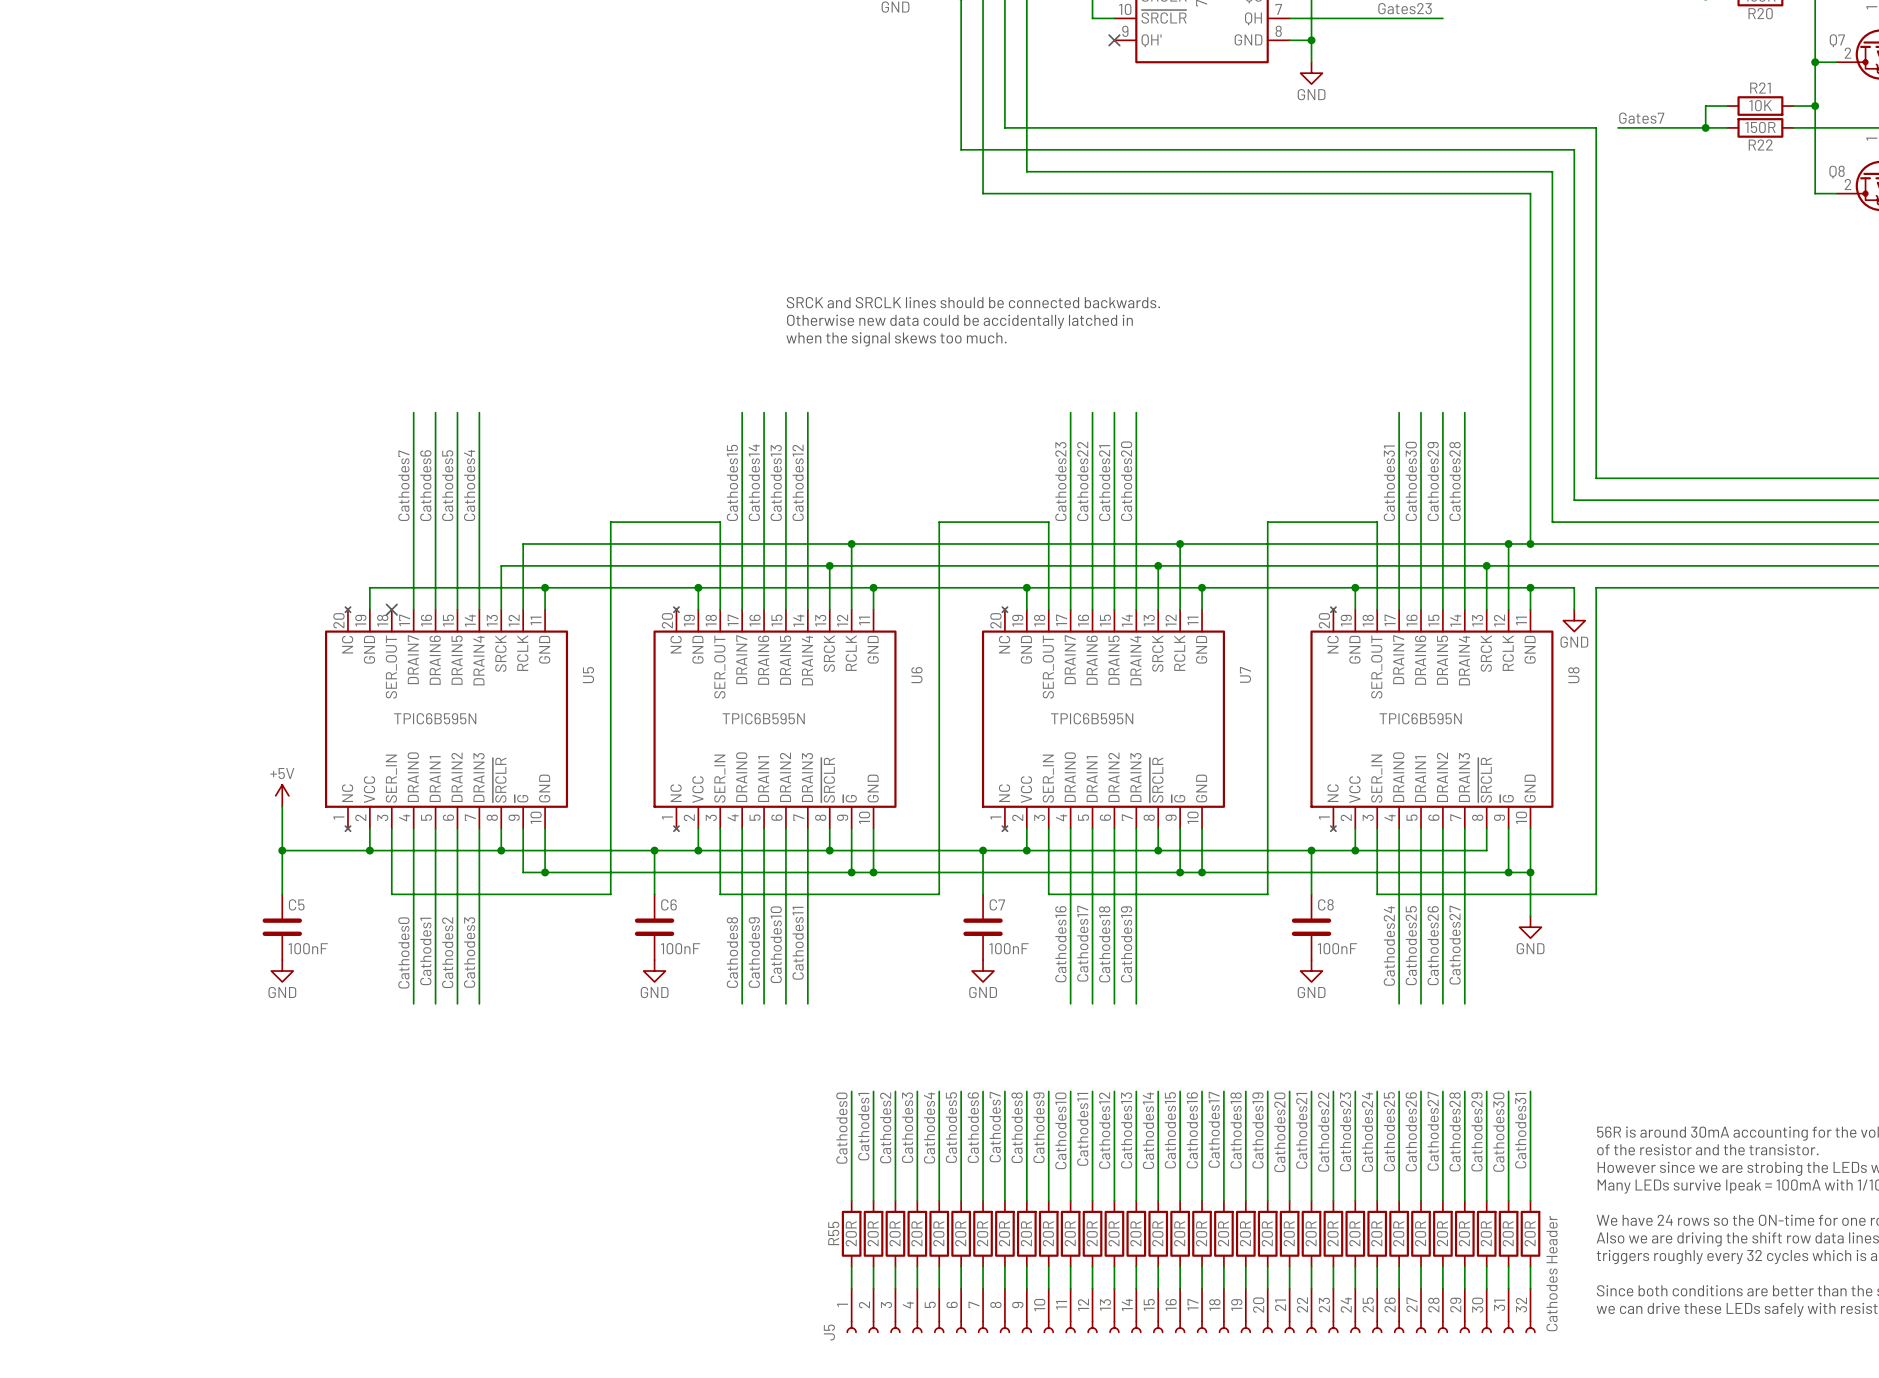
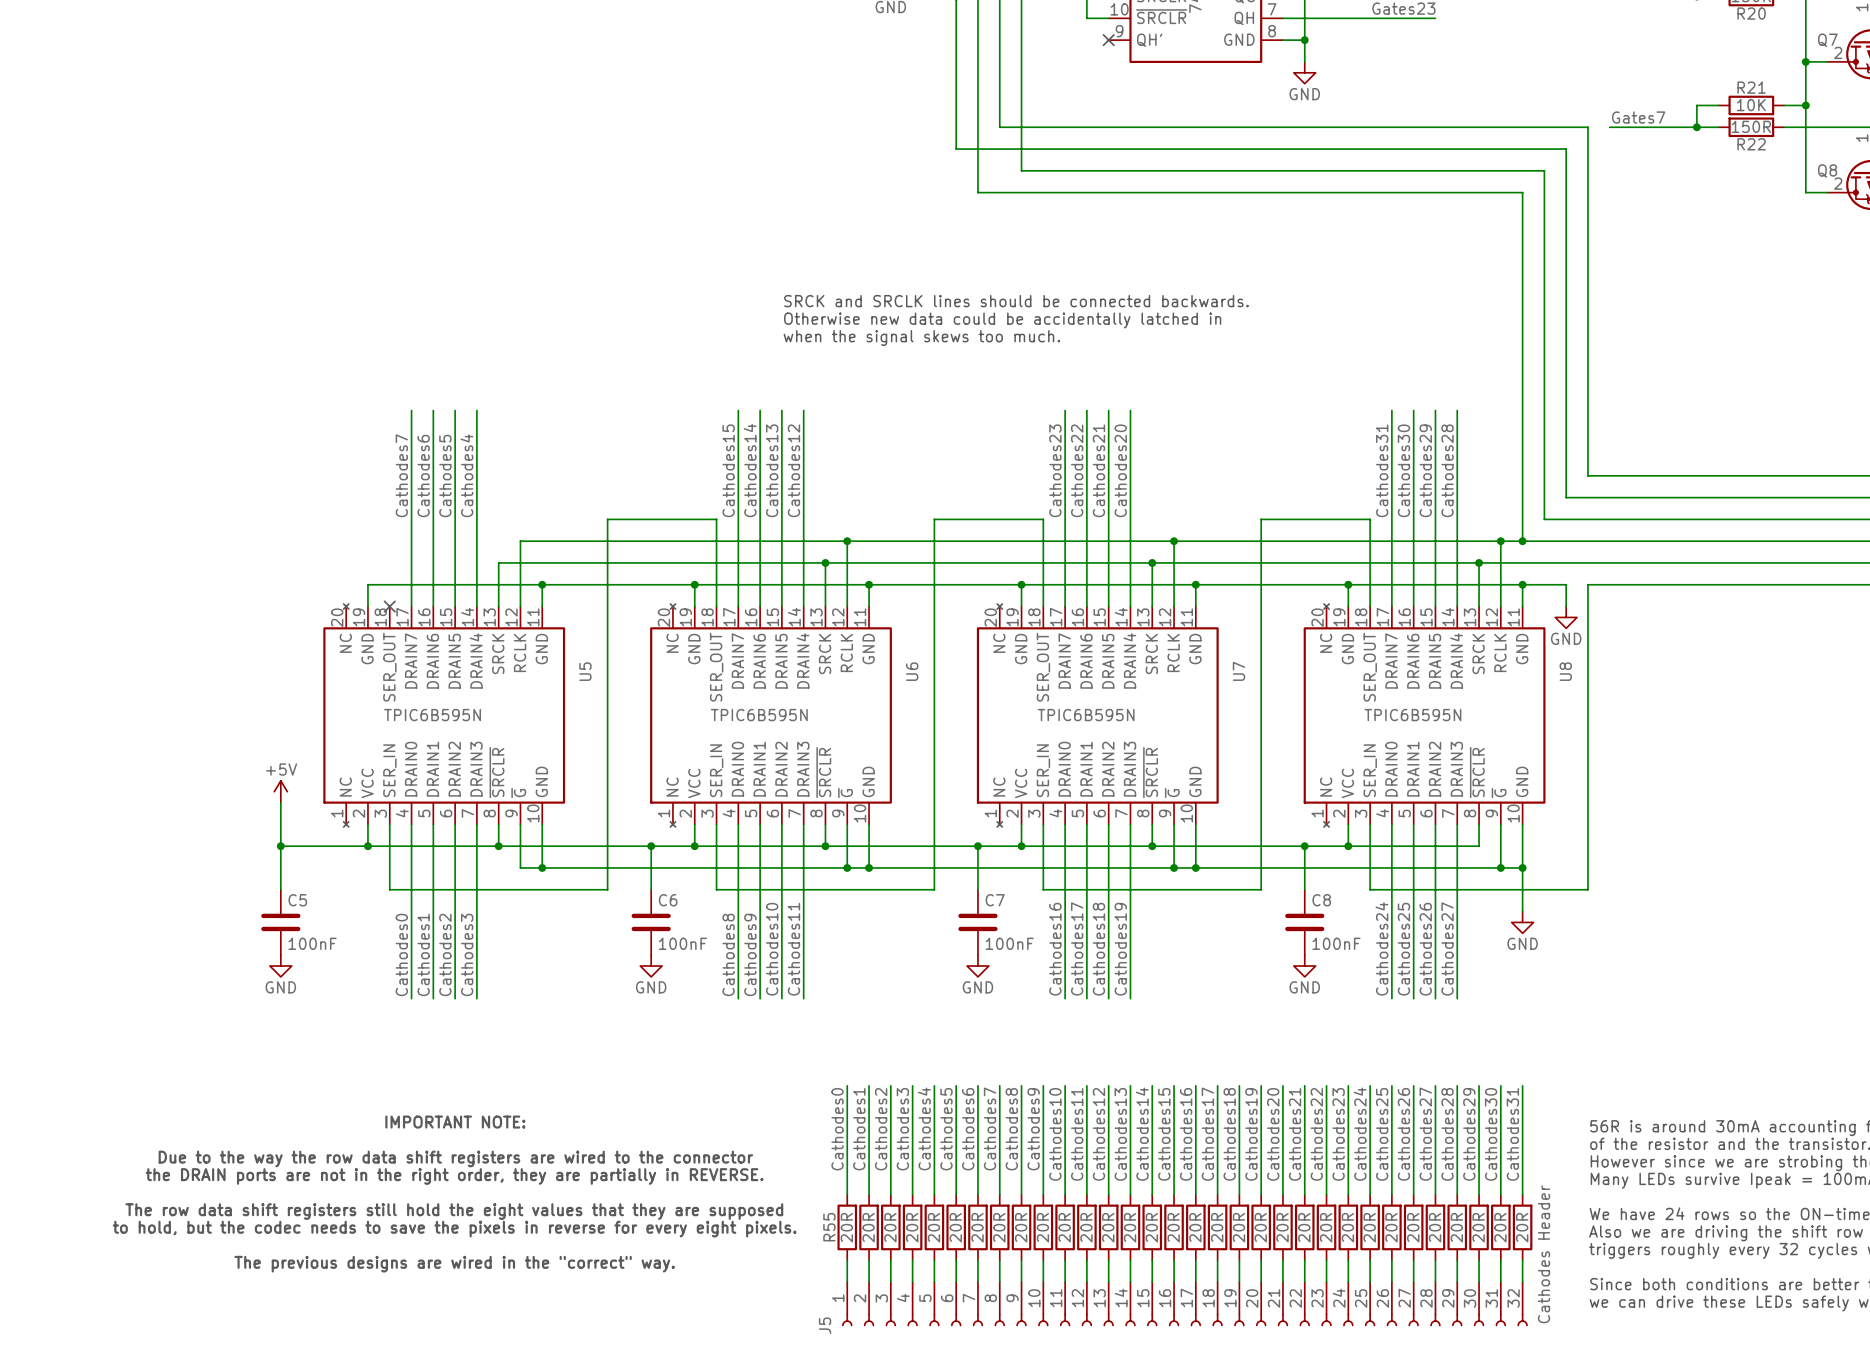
text: none -> IMPORTANT NOTE: (455, 1122)
text: none -> Due to the way the row data shift registers are wired to the connector (455, 1158)
text: none -> the DRAIN ports are not in the right order, they are partially in REVERSE. (454, 1176)
text: none -> The row data shift registers still hold the eight values that they are supposed (454, 1211)
text: none -> to hold, but the codec needs to save the pixels in reverse for every eight pixels. (454, 1229)
text: none -> The previous designs are wired in the "correct" way. (454, 1264)

